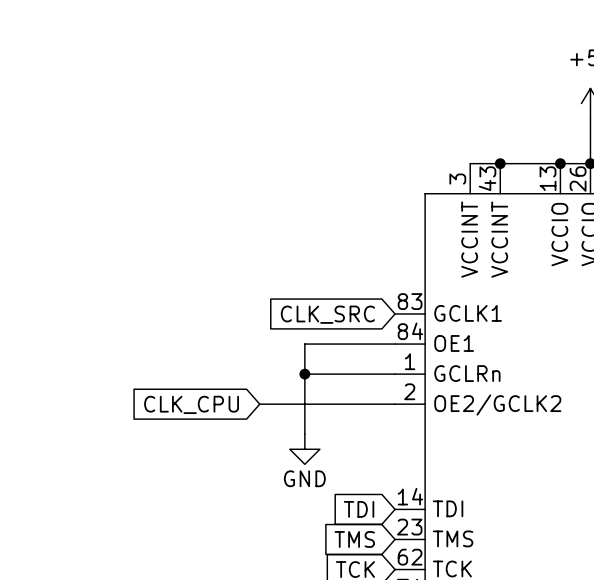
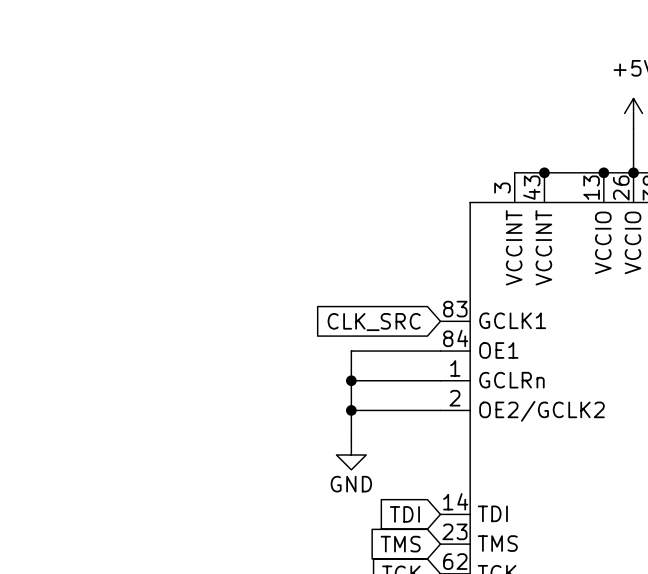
global label: CLK_CPU (191, 404) -> none
wire: (259, 404) (304, 404) -> none
junction: none -> (351, 410)

